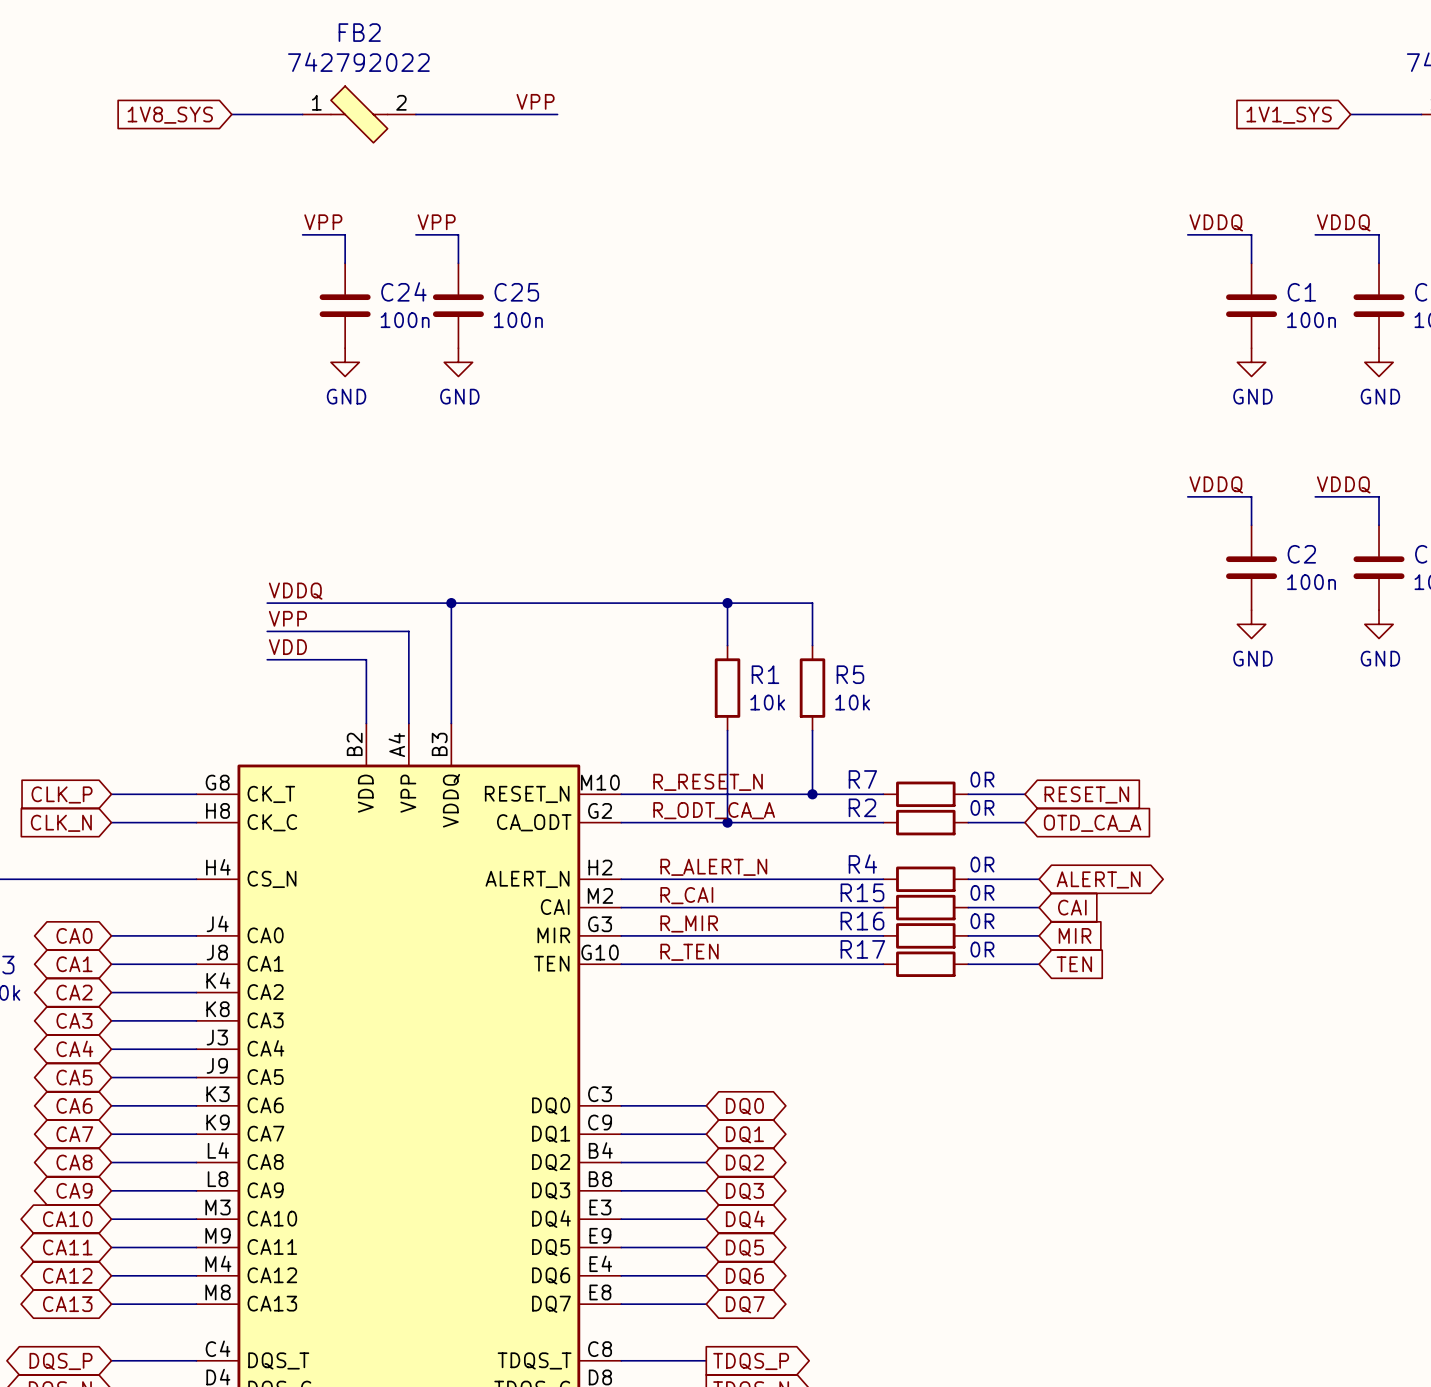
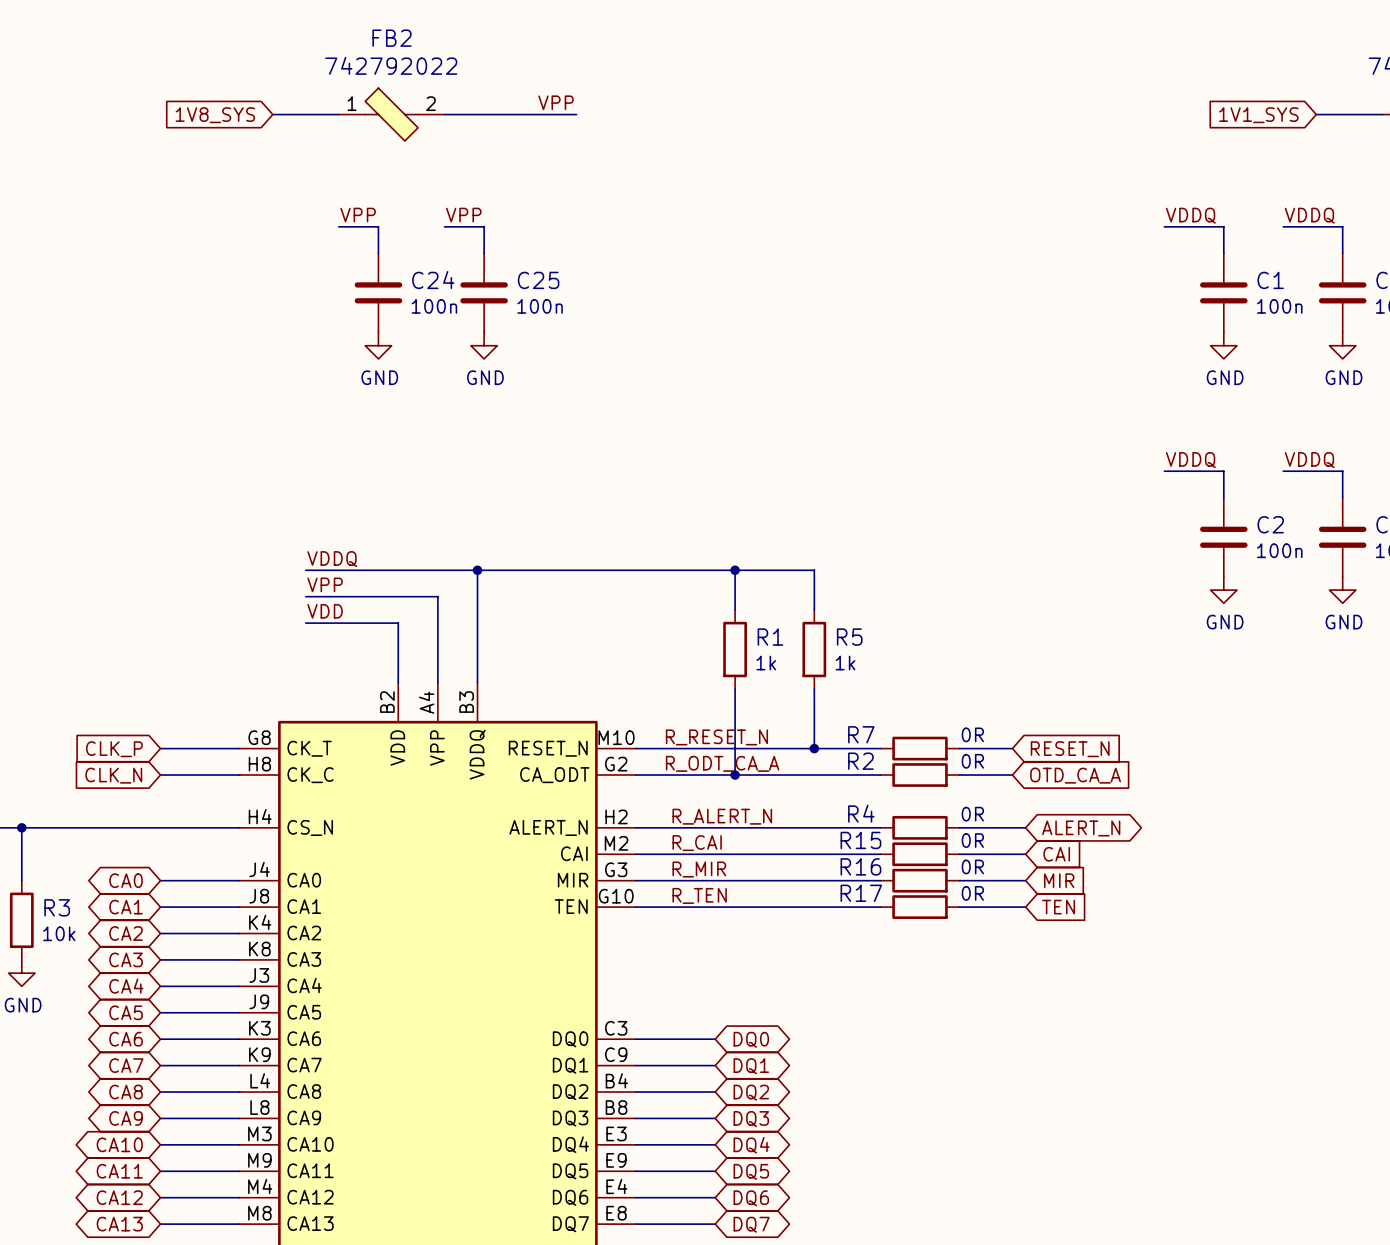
R1 text: 10k (767, 702) -> 1k (766, 663)
R5 text: 10k (852, 702) -> 1k (845, 663)

